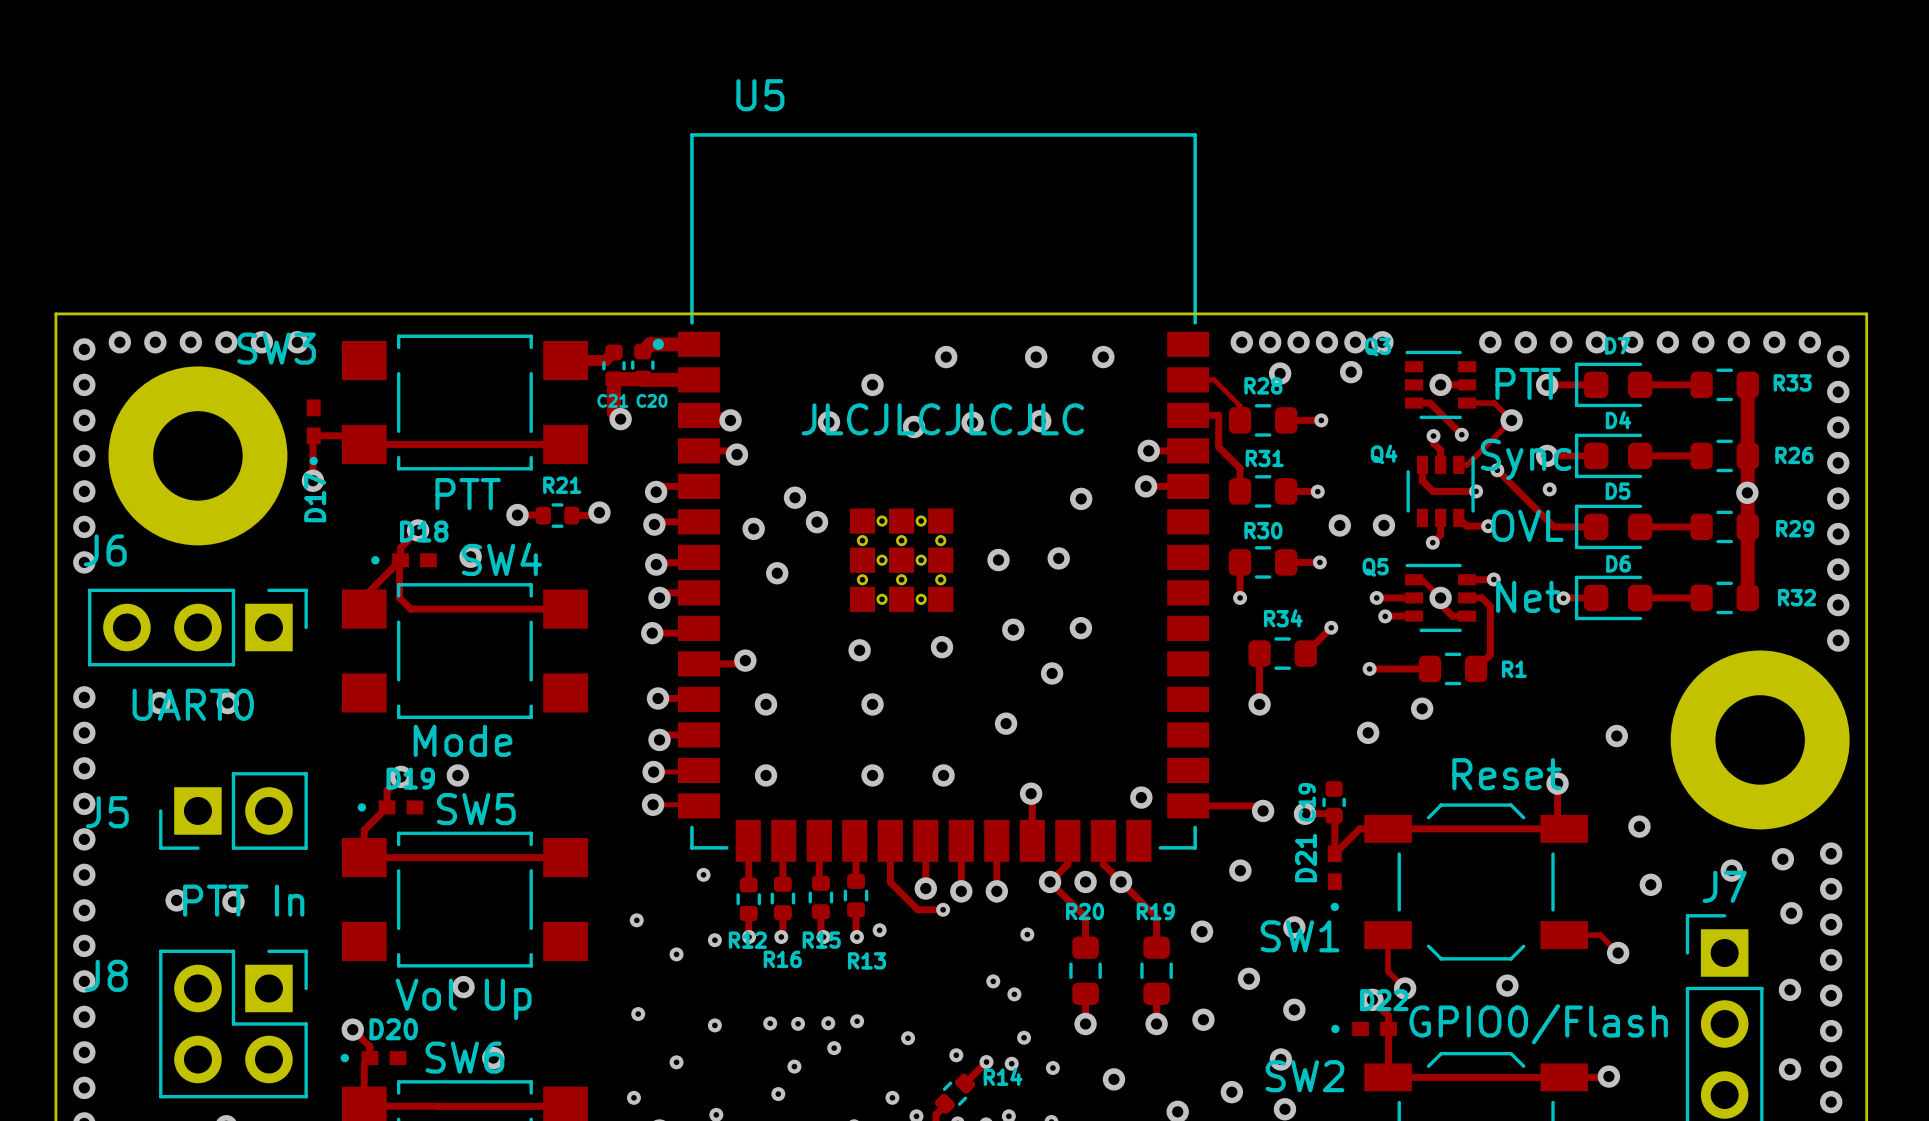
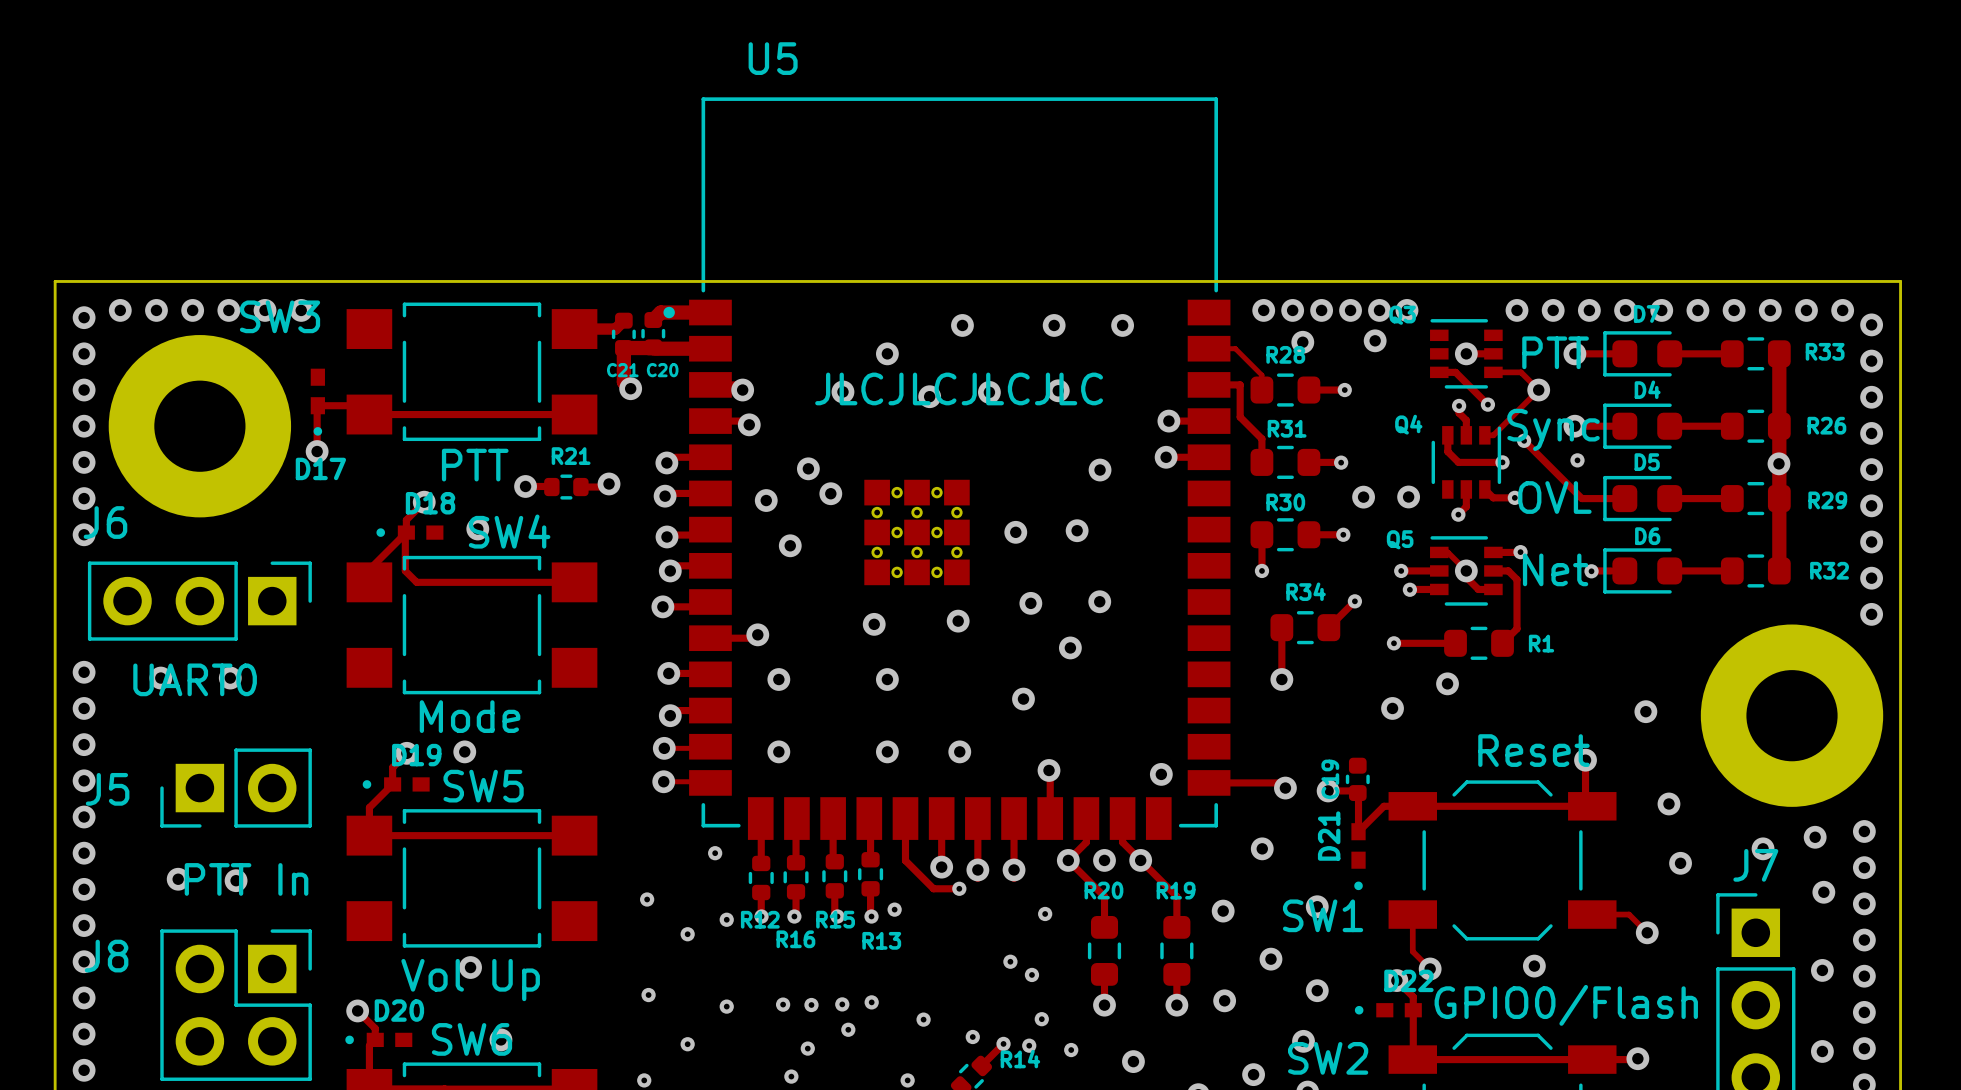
D17 name rotation: 0° (315, 497) -> 90° clockwise (320, 468)

